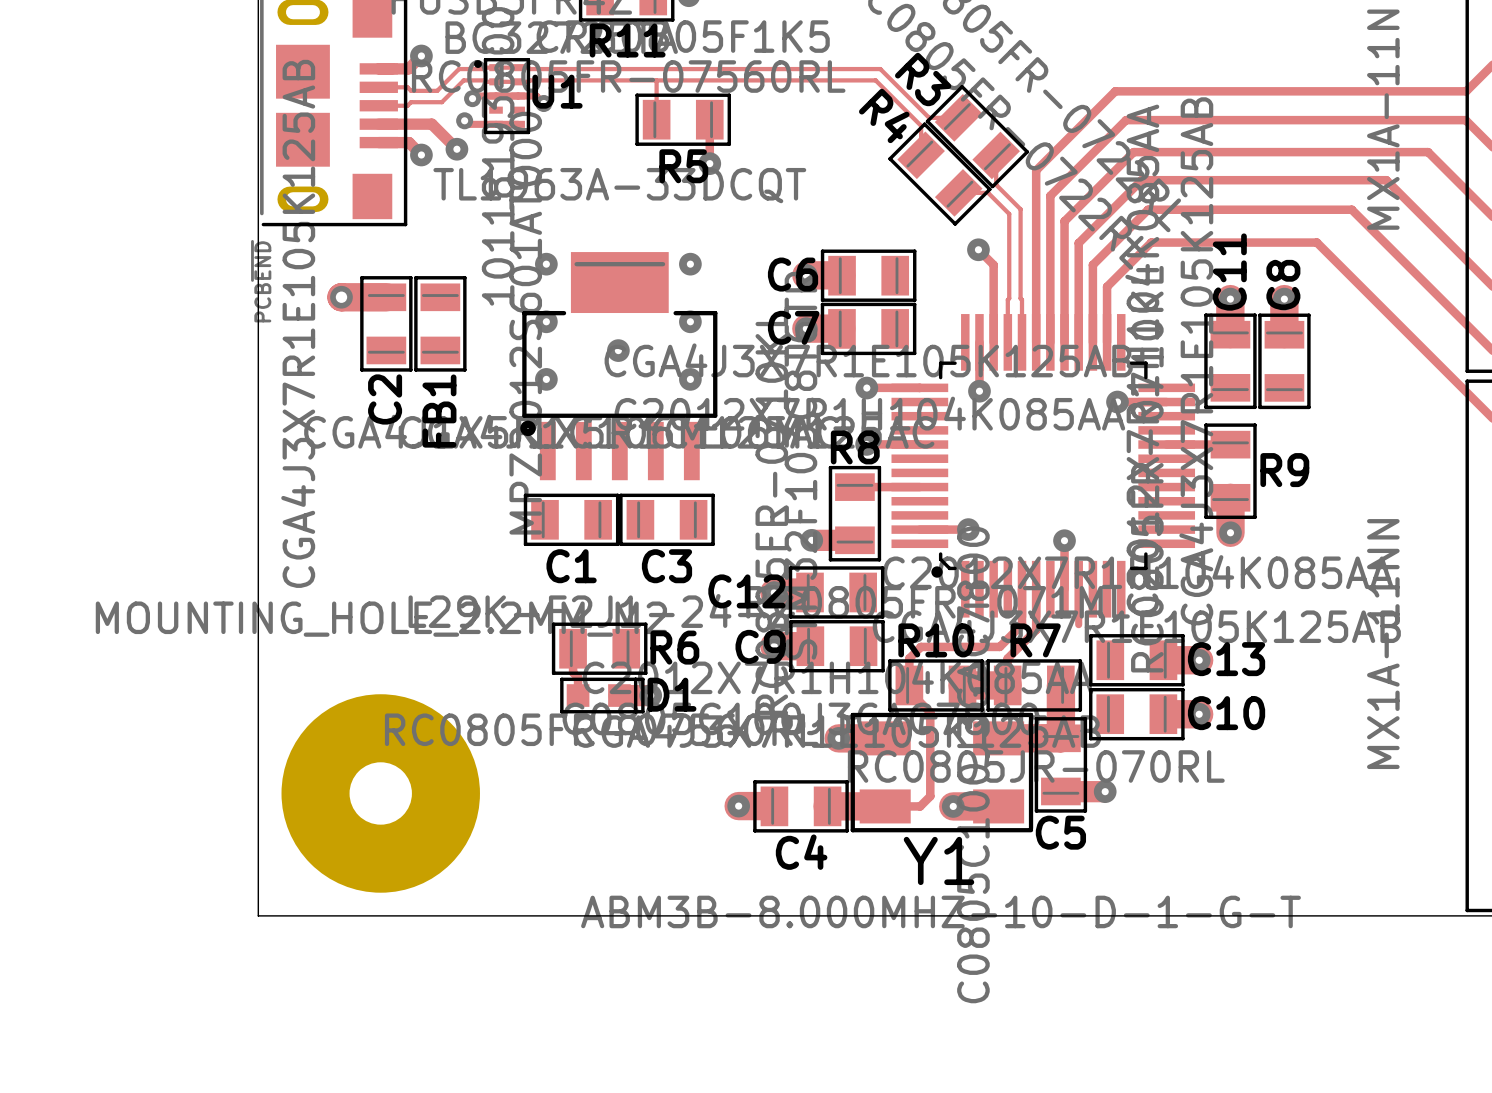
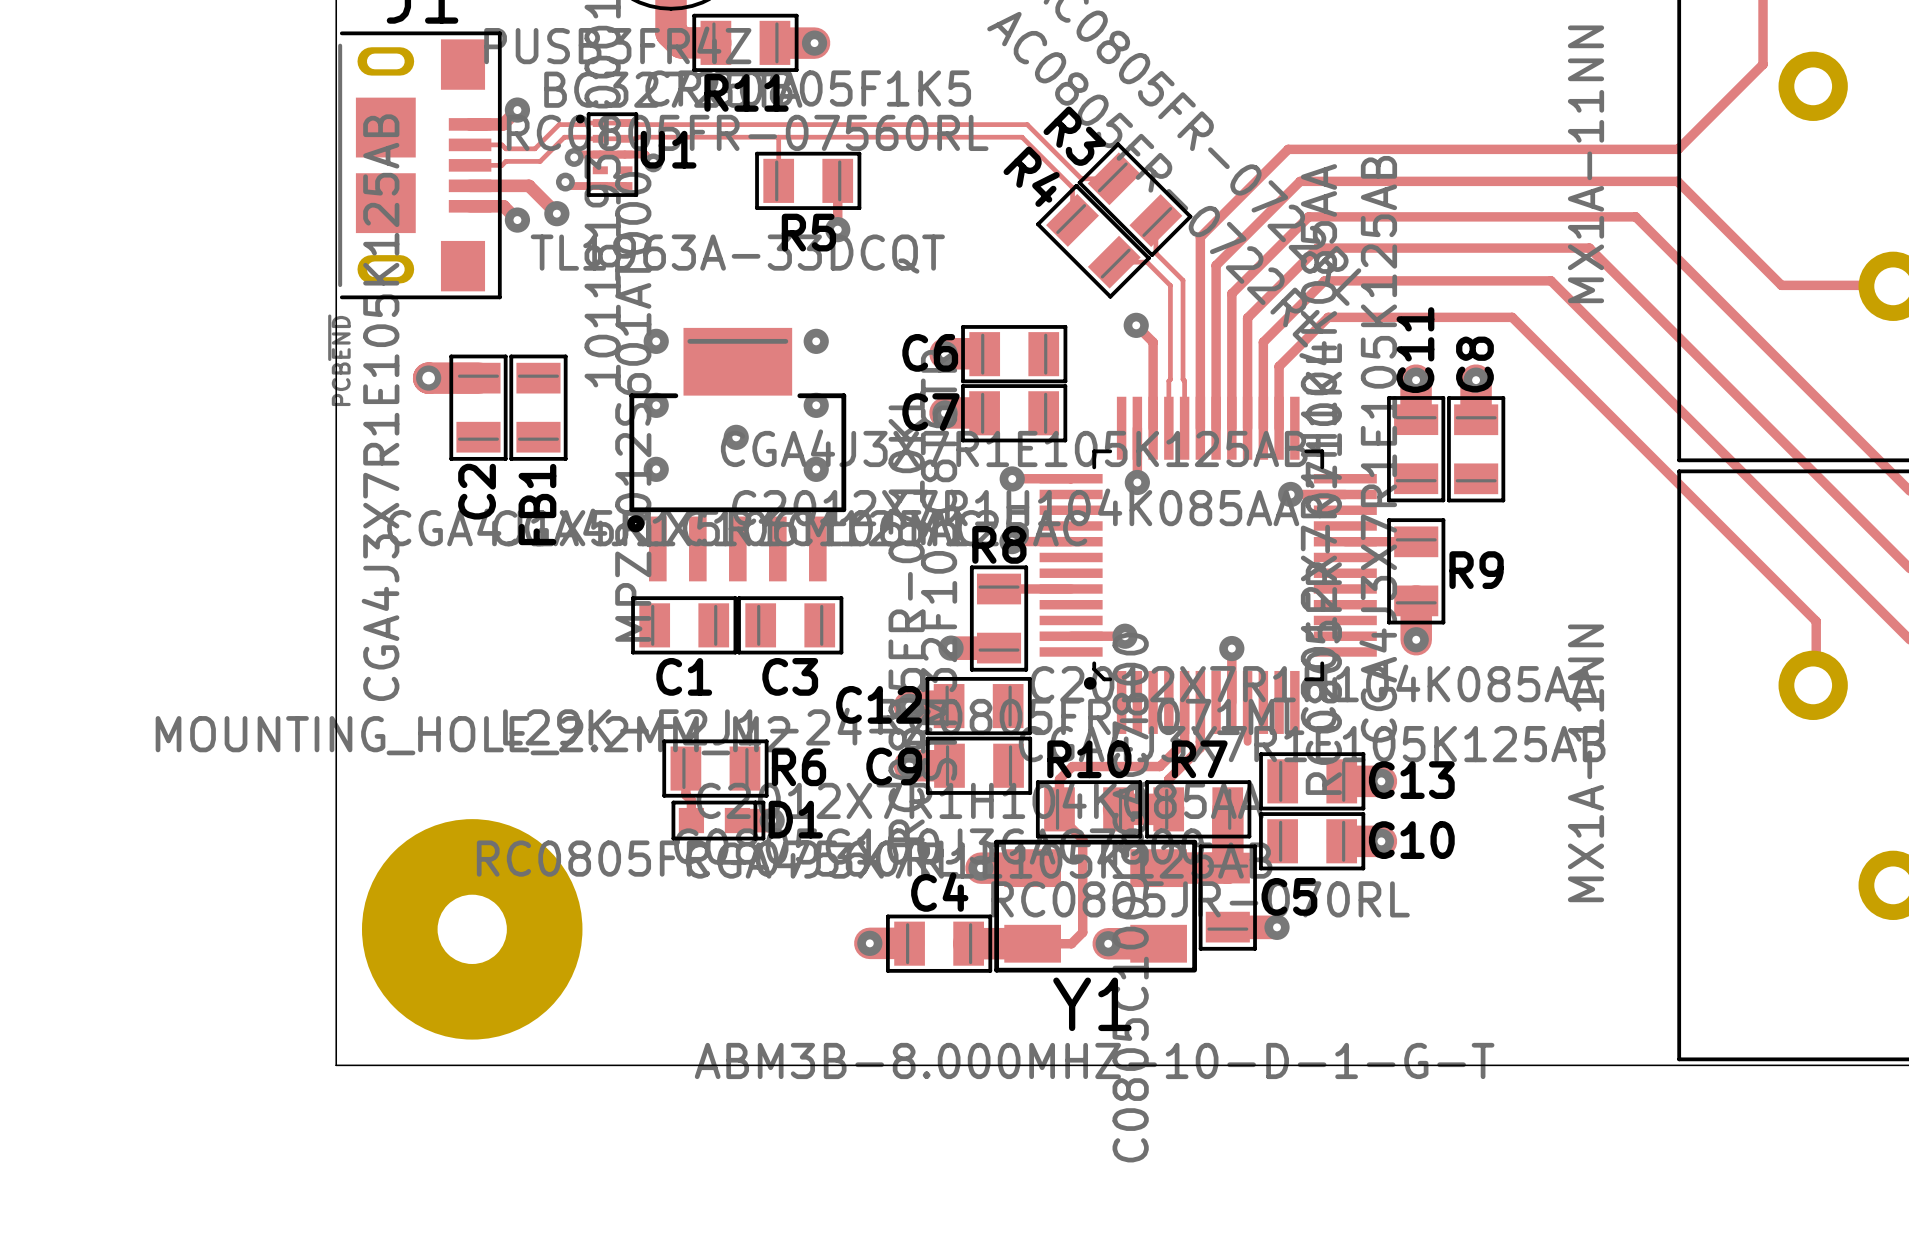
C5 name position: C5 (1060, 832) -> C5 (1289, 896)
C4 name position: C4 (801, 852) -> C4 (939, 892)

